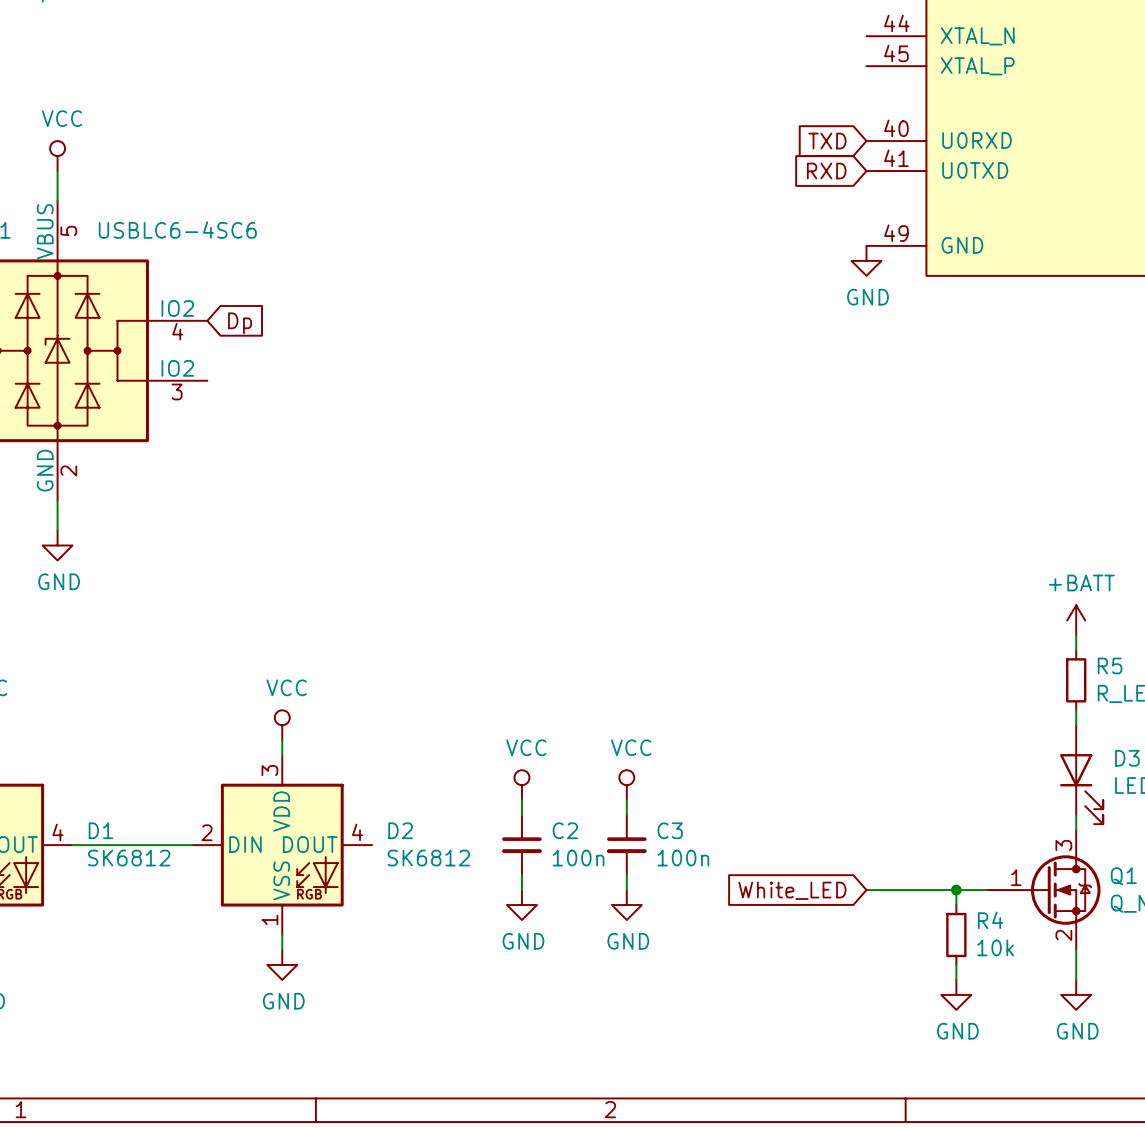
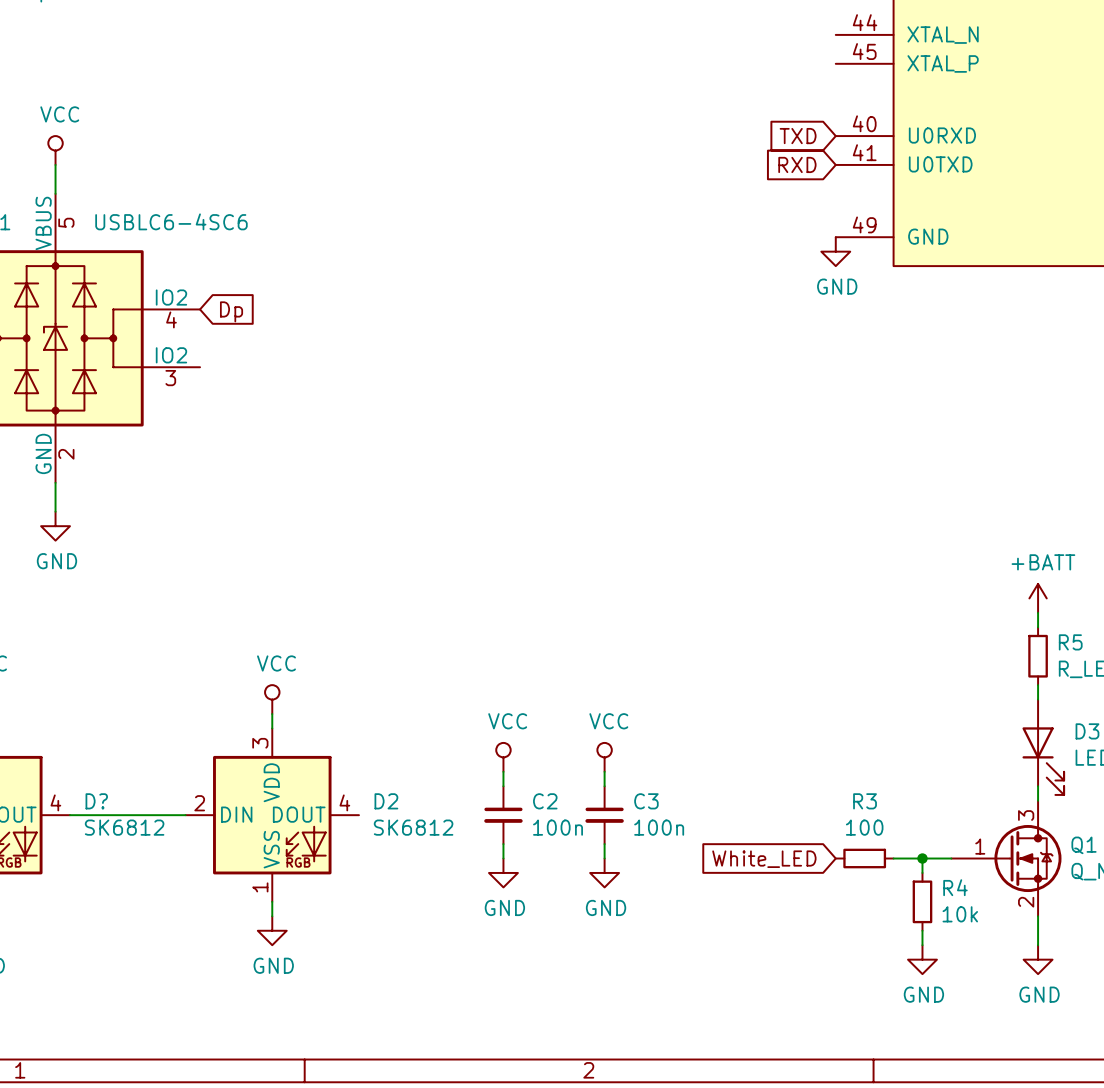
D1 name: D1 (101, 830) -> D? (96, 801)
wire: (866, 890) (926, 890) -> none
R3: none -> 100 (864, 858)

